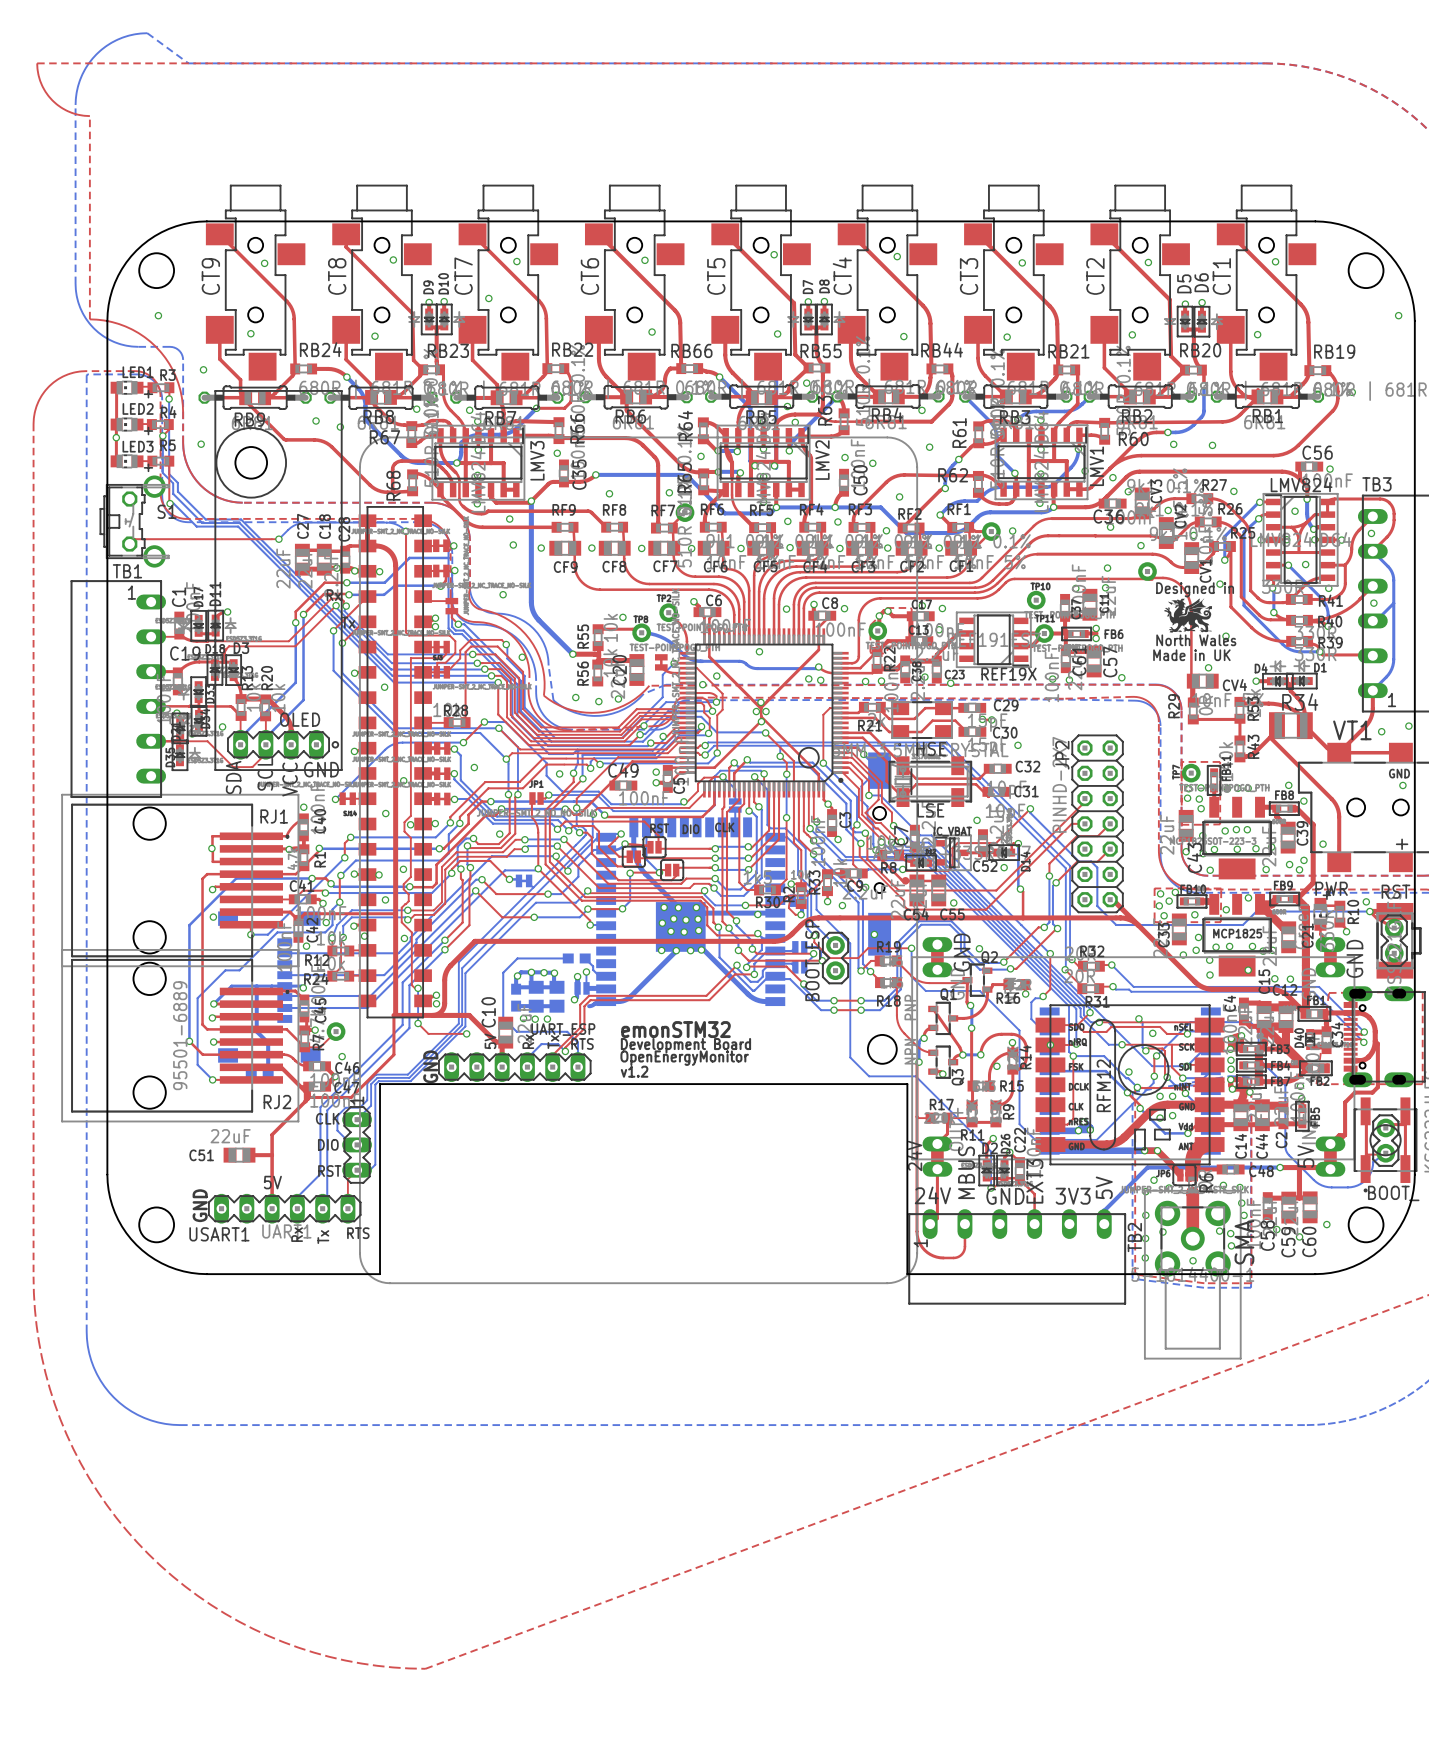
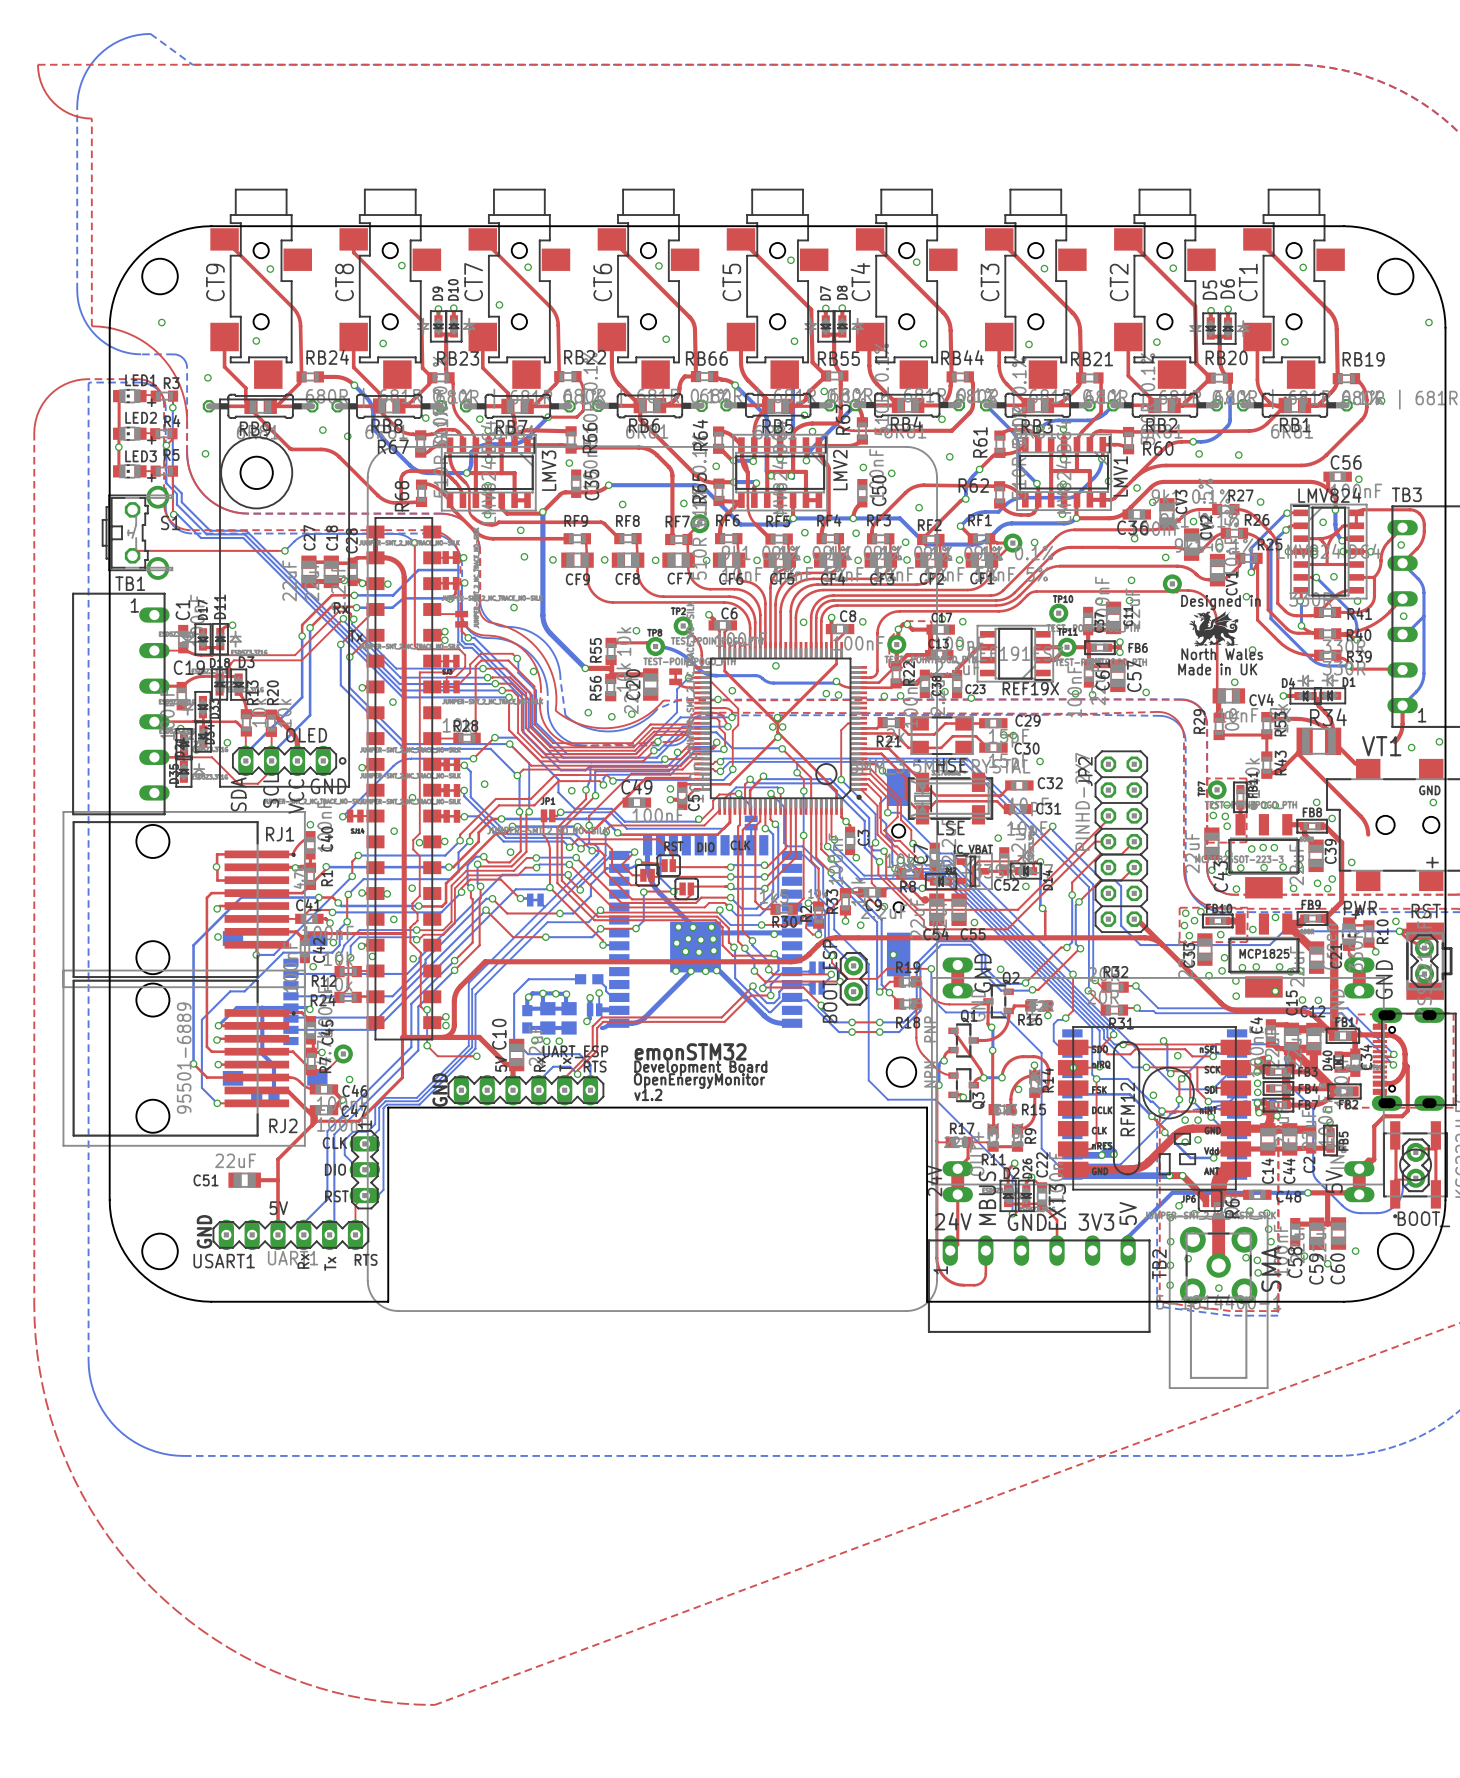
top track: (1365, 726) (1339, 752) -> none
top track: (1339, 752) (1400, 752) -> none
top track: (1339, 816) (1339, 862) (1339, 845) -> none

